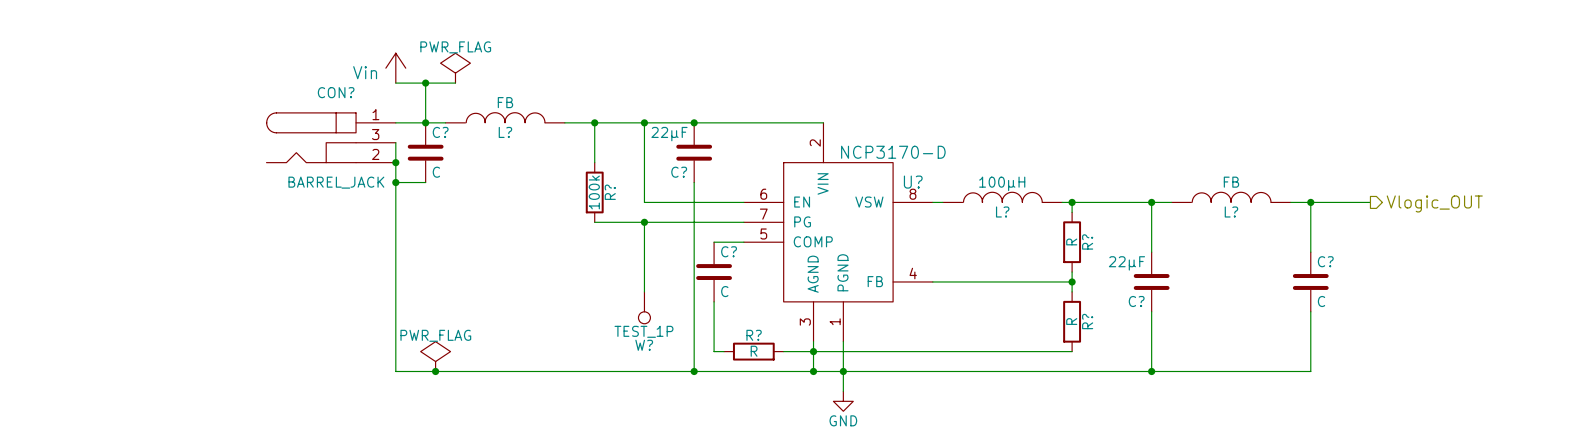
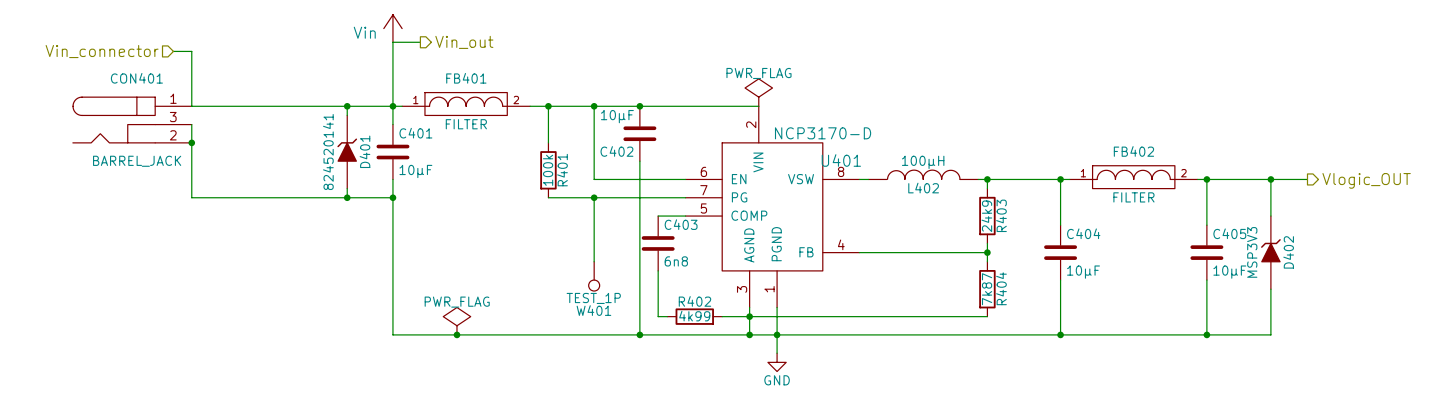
wire: none -> (420, 42) (392, 42) (392, 69)
hierarchical label: none -> Vin_out (464, 42)
hierarchical label: none -> Vin_connector (102, 51)
wire: none -> (173, 51) (191, 51) (191, 106) (365, 106)
power symbol position: Vin (395, 68) -> Vin (392, 28)
power symbol: PWR_FLAG (455, 68) -> none
wire: (395, 83) (455, 83) -> none
junction: (425, 83) -> none
power symbol: none -> PWR_FLAG (758, 92)
L?: FB (505, 117) -> none
FB401: none -> FILTER (466, 104)
wire: none -> (347, 106) (347, 115)
junction: none -> (347, 106)
C? value: 22µF (669, 134) -> 10µF (617, 116)
CON401: none -> BARREL_JACK (132, 120)
CON?: BARREL_JACK (331, 137) -> none
wire: none -> (191, 124) (191, 197) (392, 197)
wire: (395, 142) (395, 371) (425, 371) -> (392, 179) (392, 334)
C?: C (425, 152) -> none
junction: none -> (191, 142)
junction: (395, 162) -> none
D401: none -> 824520141 (347, 152)
C401: none -> 10µF (392, 152)
C? name: C? (679, 172) -> C402 (616, 151)
wire: (395, 182) (425, 182) -> none
junction: (395, 182) -> none
U? name: U? (913, 182) -> U401 (841, 160)
R? name: R? (610, 192) -> R401 (562, 170)
L?: FB (1231, 197) -> none
FB402: none -> FILTER (1133, 177)
wire: none -> (1261, 179) (1307, 179)
wire: none -> (1270, 179) (1270, 216)
junction: none -> (1270, 179)
hierarchical label position: Vlogic_OUT (1434, 203) -> Vlogic_OUT (1366, 180)
L? name: L? (1002, 211) -> L402 (923, 188)
wire: none -> (347, 188) (347, 197)
junction: none -> (347, 197)
junction: none -> (392, 197)
R? value: R (1071, 241) -> 24k9 (986, 216)
R? name: R? (1087, 241) -> R403 (1001, 215)
C? name: C? (729, 251) -> C403 (681, 224)
C? name: C? (1325, 261) -> C405 (1229, 233)
C? value: 22µF (1126, 263) -> 10µF (1083, 272)
D402: none -> MSP3V3 (1270, 252)
C? value: C (724, 291) -> 6n8 (676, 261)
C? name: C? (1136, 301) -> C404 (1083, 233)
C? value: C (1321, 301) -> 10µF (1229, 272)
R? value: R (1071, 321) -> 7k87 (987, 289)
R? name: R? (1087, 321) -> R404 (1001, 288)
wire: none -> (1270, 289) (1270, 334) (1206, 334)
R? name: R? (754, 335) -> R402 (694, 301)
W? name: W? (644, 345) -> W401 (593, 310)
R? value: R (754, 351) -> 4k99 (694, 316)
power symbol position: PWR_FLAG (435, 356) -> PWR_FLAG (456, 321)
junction: (435, 371) -> none
junction: none -> (456, 334)
junction: none -> (1206, 334)

